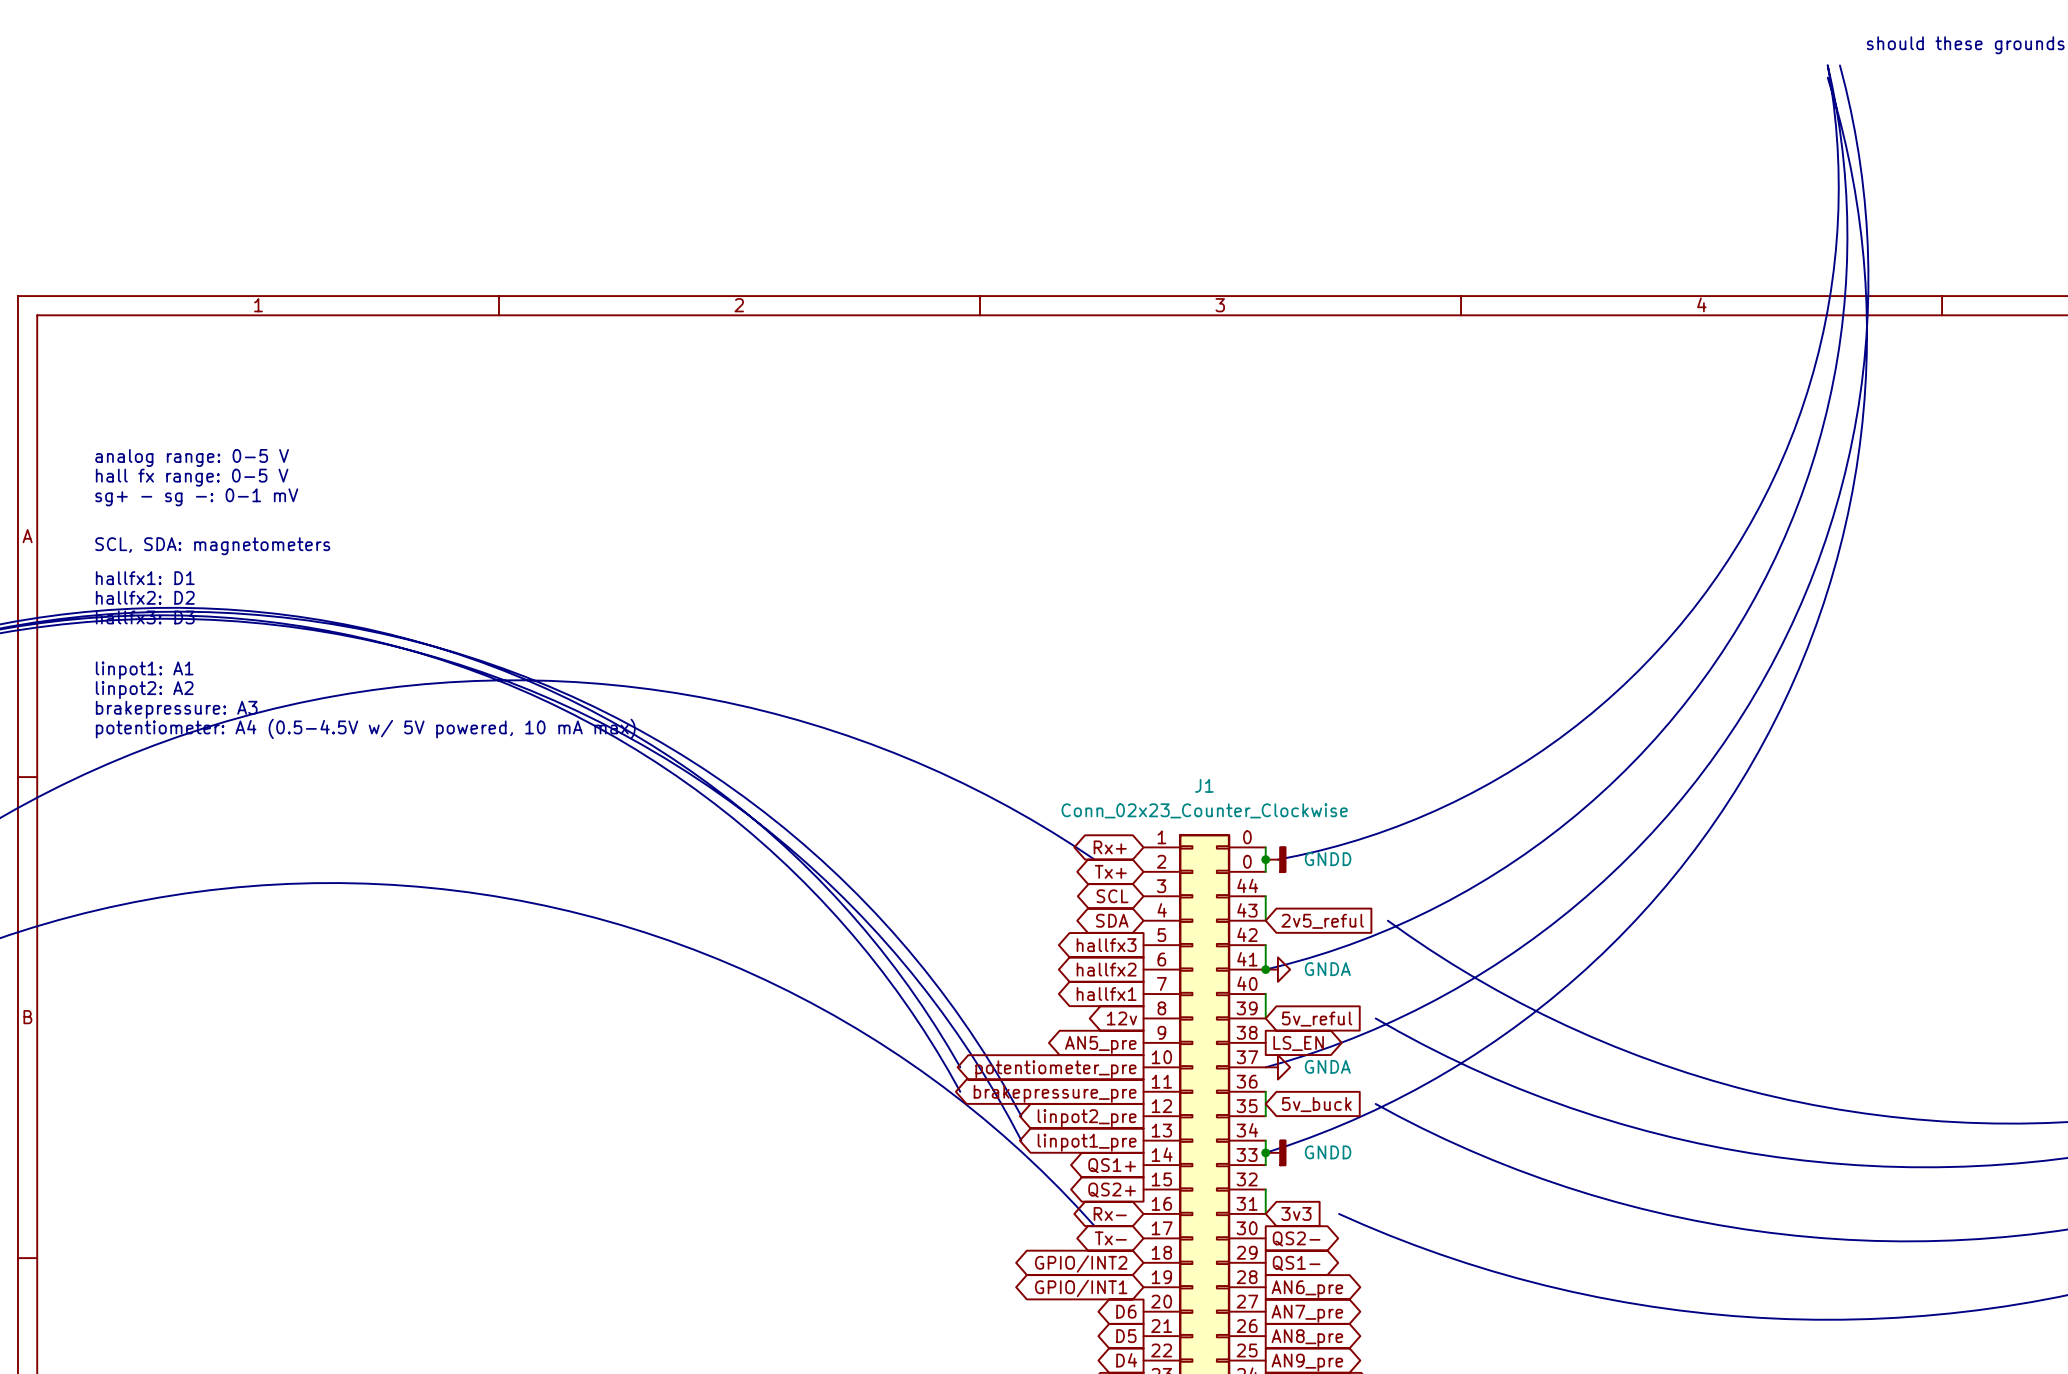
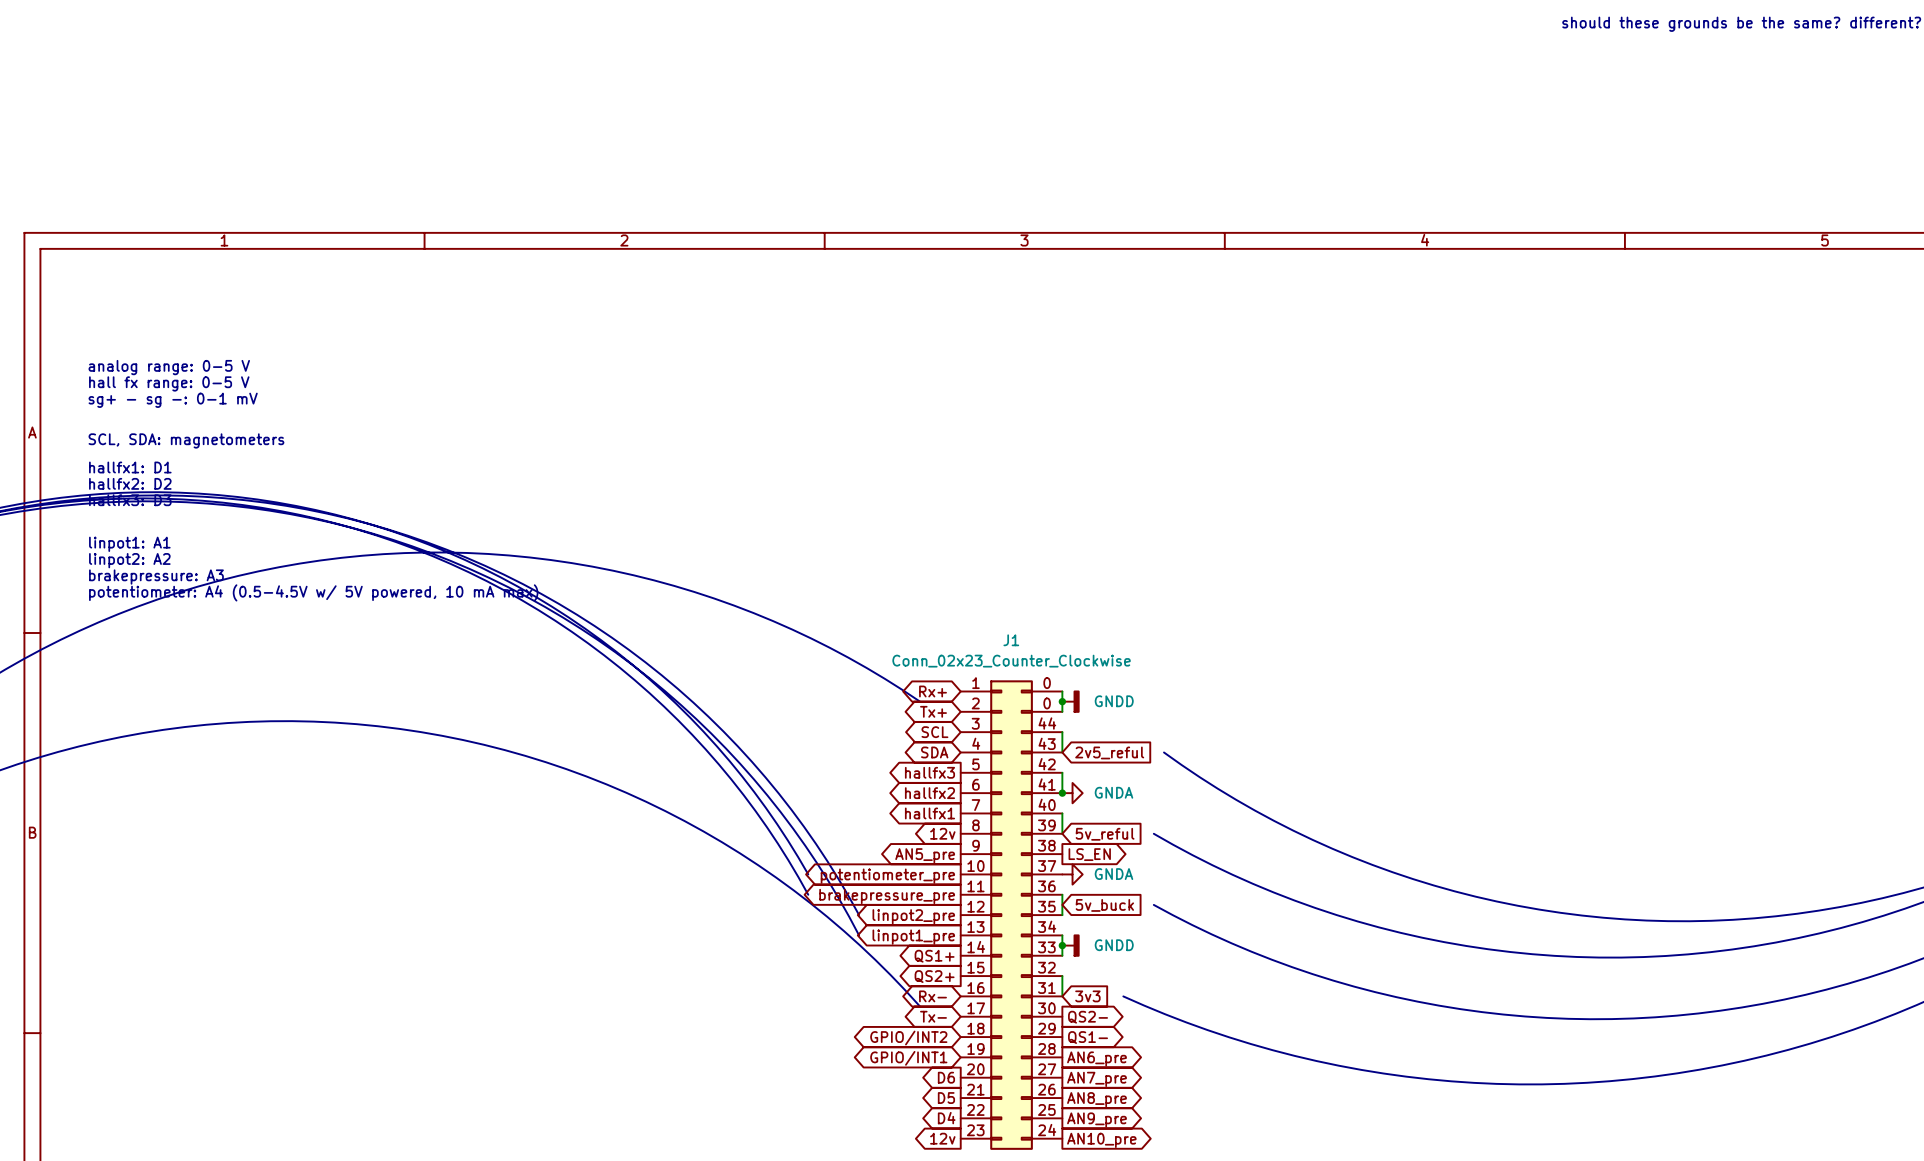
line: (1839, 65) (1858, 155) (1866, 223) (1868, 291) (1861, 383) (1850, 451) (1825, 539) (1791, 624) (1760, 685) (1710, 762) (1667, 815) (1620, 865) (1551, 925) (1494, 965) (1415, 1010) (1352, 1038) (1265, 1067) -> none
line: (1827, 77) (1850, 167) (1861, 236) (1867, 329) (1862, 422) (1848, 513) (1830, 581) (1799, 668) (1769, 731) (1734, 792) (1680, 867) (1619, 937) (1568, 984) (1494, 1041) (1415, 1089) (1352, 1120) (1265, 1152) -> none
line: (1277, 859) (1338, 845) (1416, 819) (1472, 792) (1525, 761) (1576, 725) (1623, 685) (1666, 641) (1717, 576) (1760, 505) (1786, 449) (1807, 391) (1823, 331) (1833, 270) (1838, 209) (1837, 147) (1827, 65) (1842, 151) (1847, 217) (1846, 282) (1835, 369) (1821, 433) (1793, 516) (1766, 576) (1733, 633) (1683, 705) (1640, 755) (1593, 800) (1542, 841) (1487, 878) (1410, 919) (1349, 944) (1265, 969) -> none

